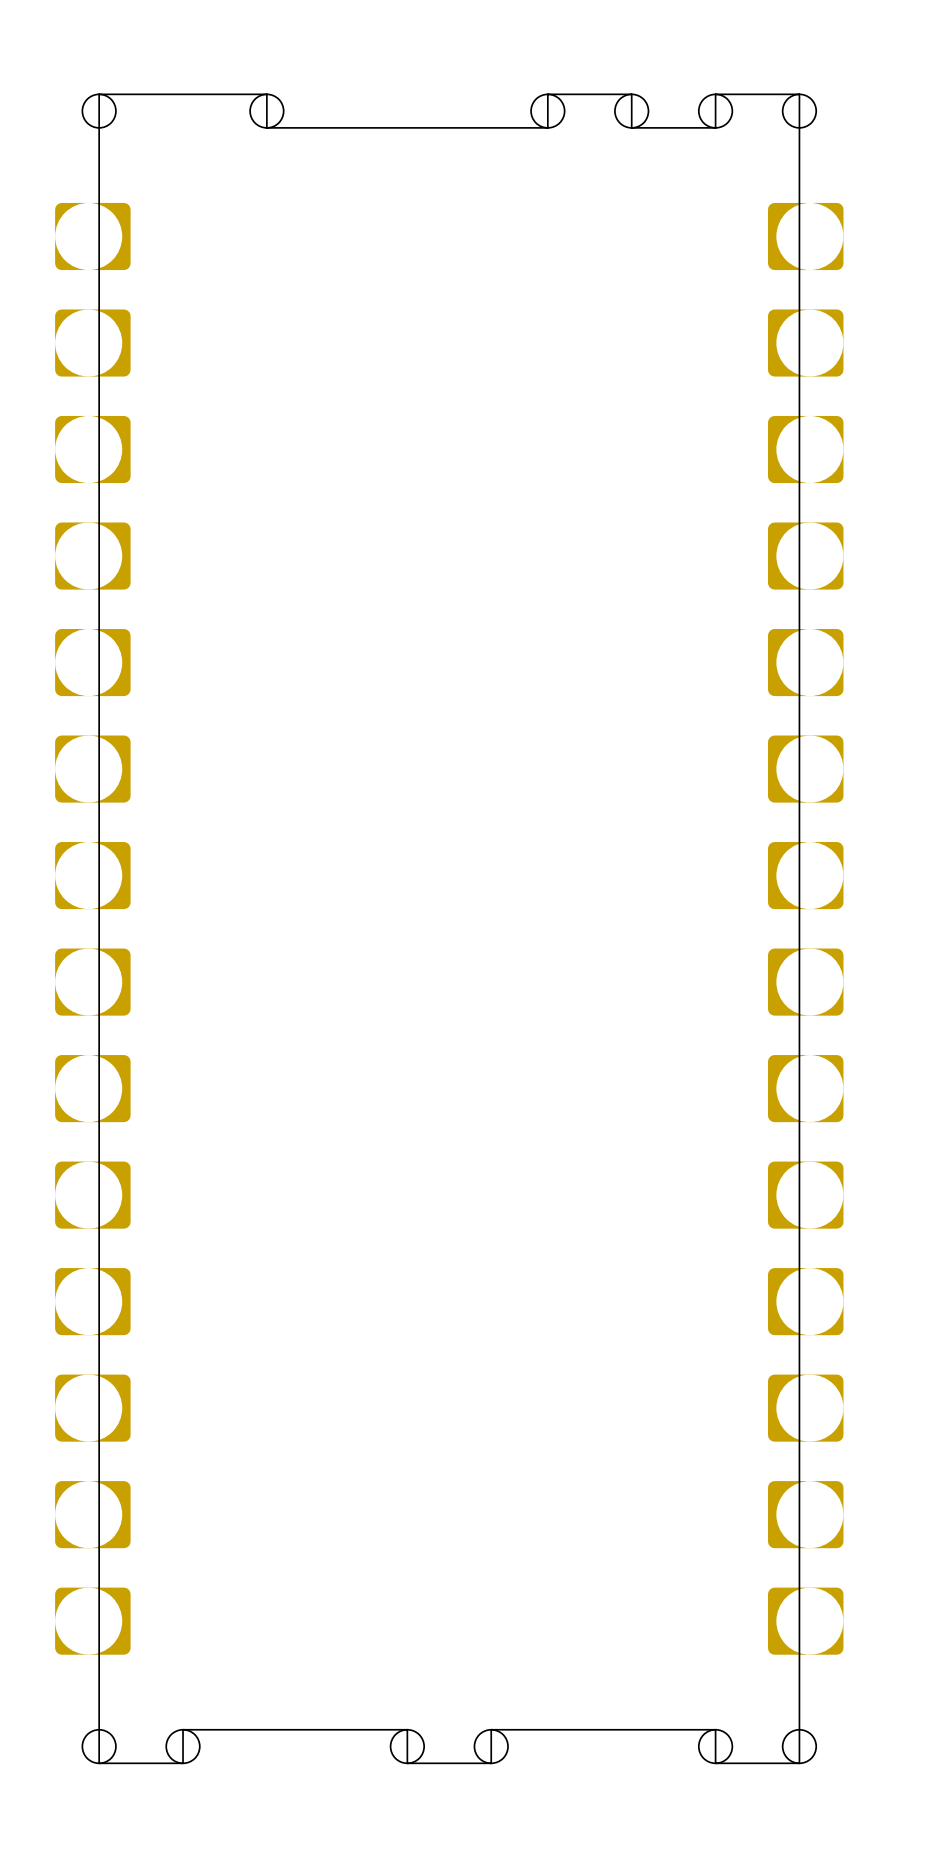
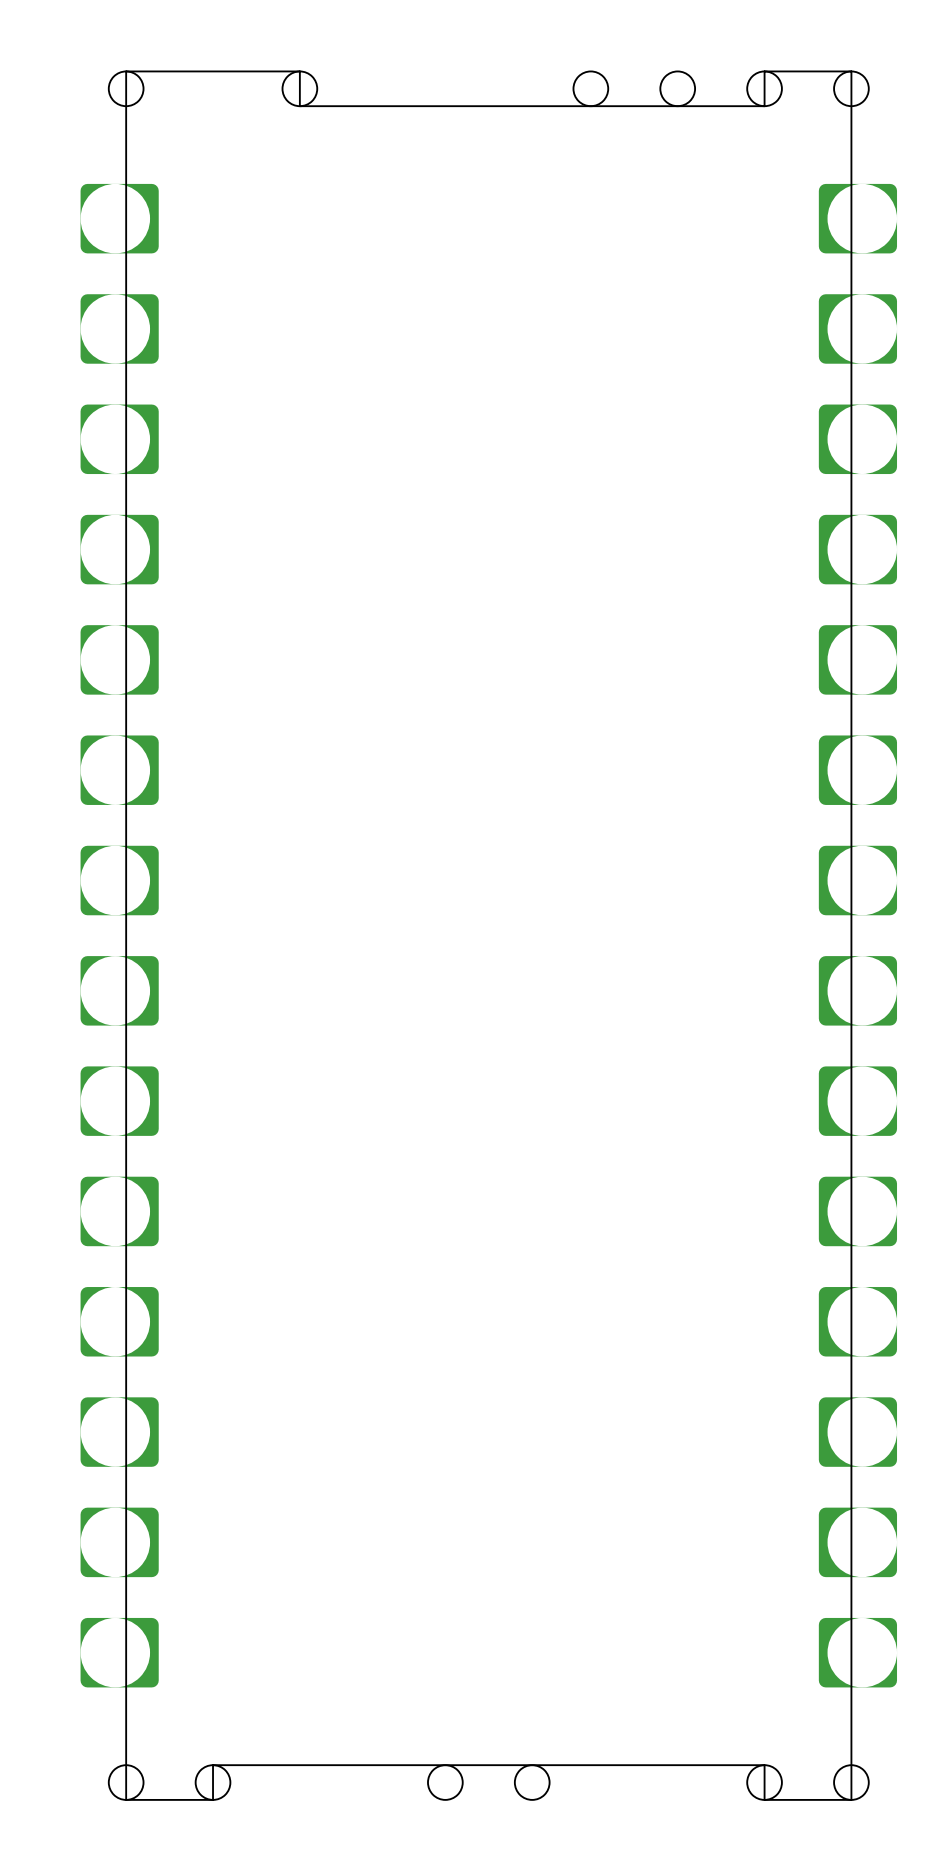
board edge: (547, 127) (547, 94) (631, 94) (631, 127) -> (590, 106) (677, 106)
board edge: (407, 1729) (407, 1763) (491, 1763) (491, 1729) -> (445, 1765) (532, 1765)

